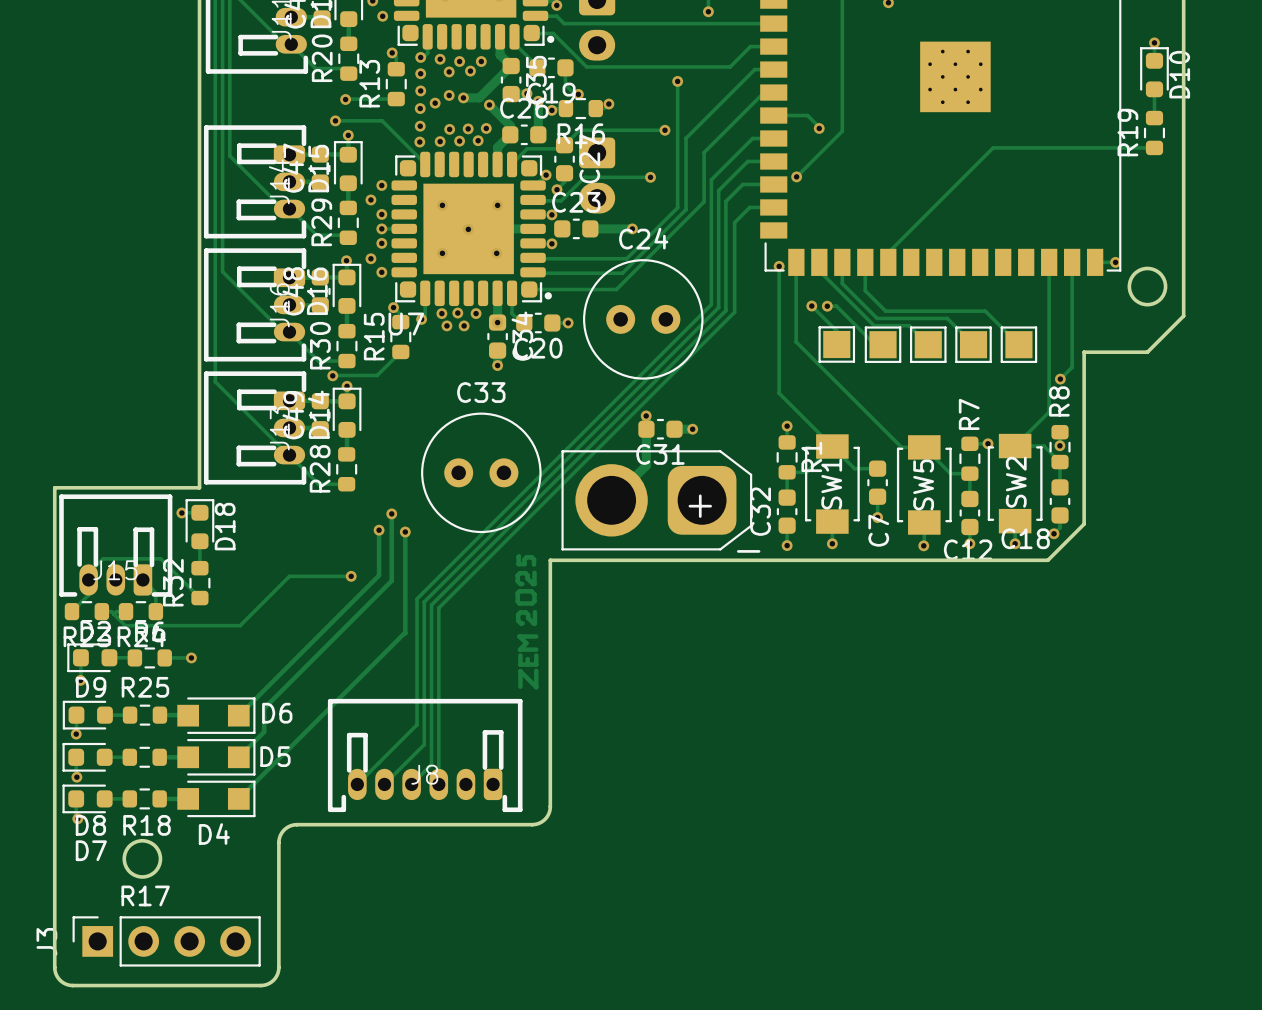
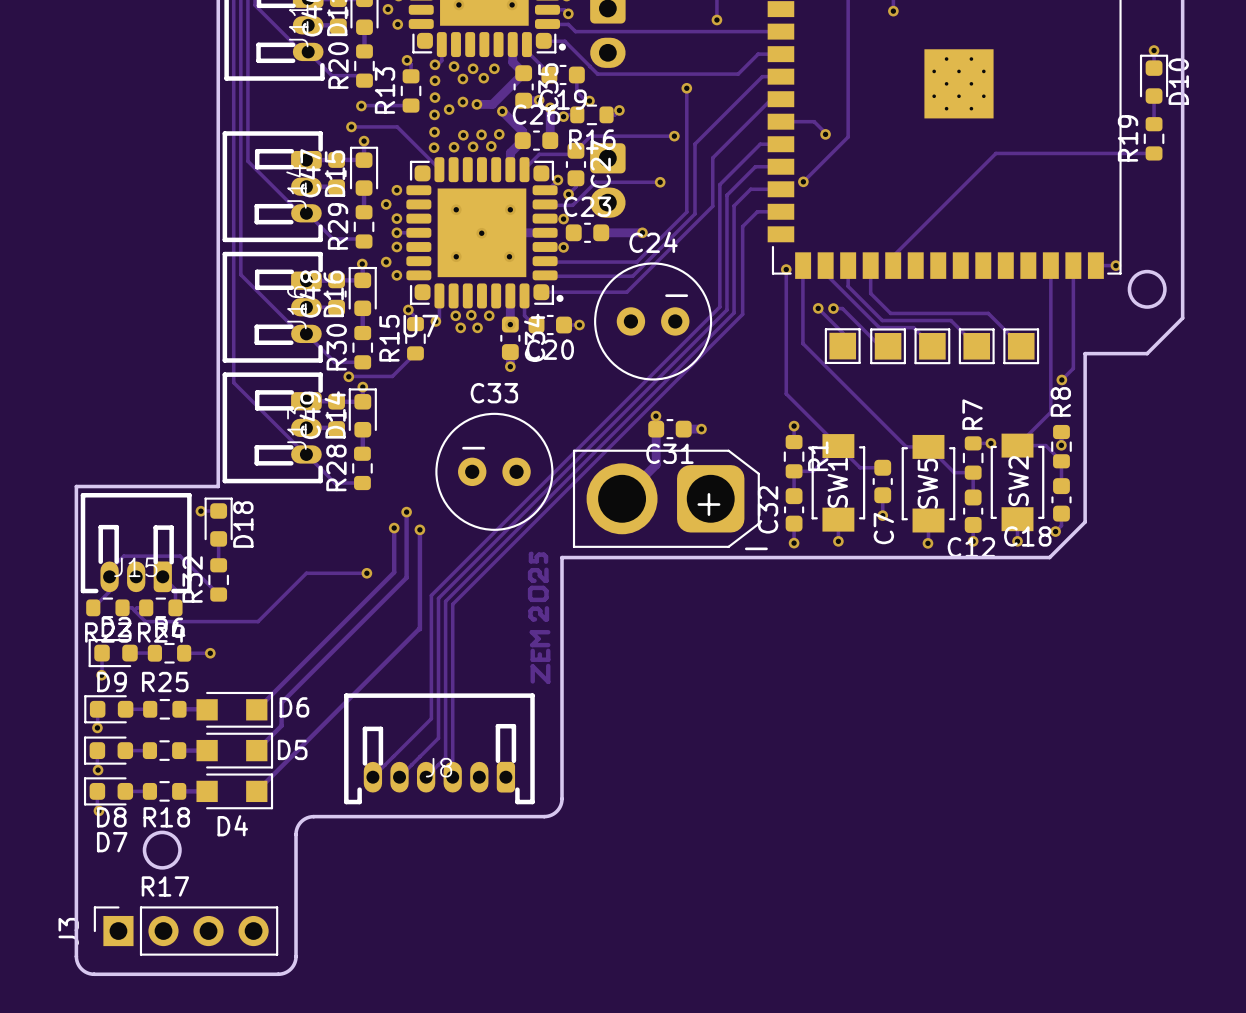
text: none -> - (676, 295)
text: none -> - (473, 448)

